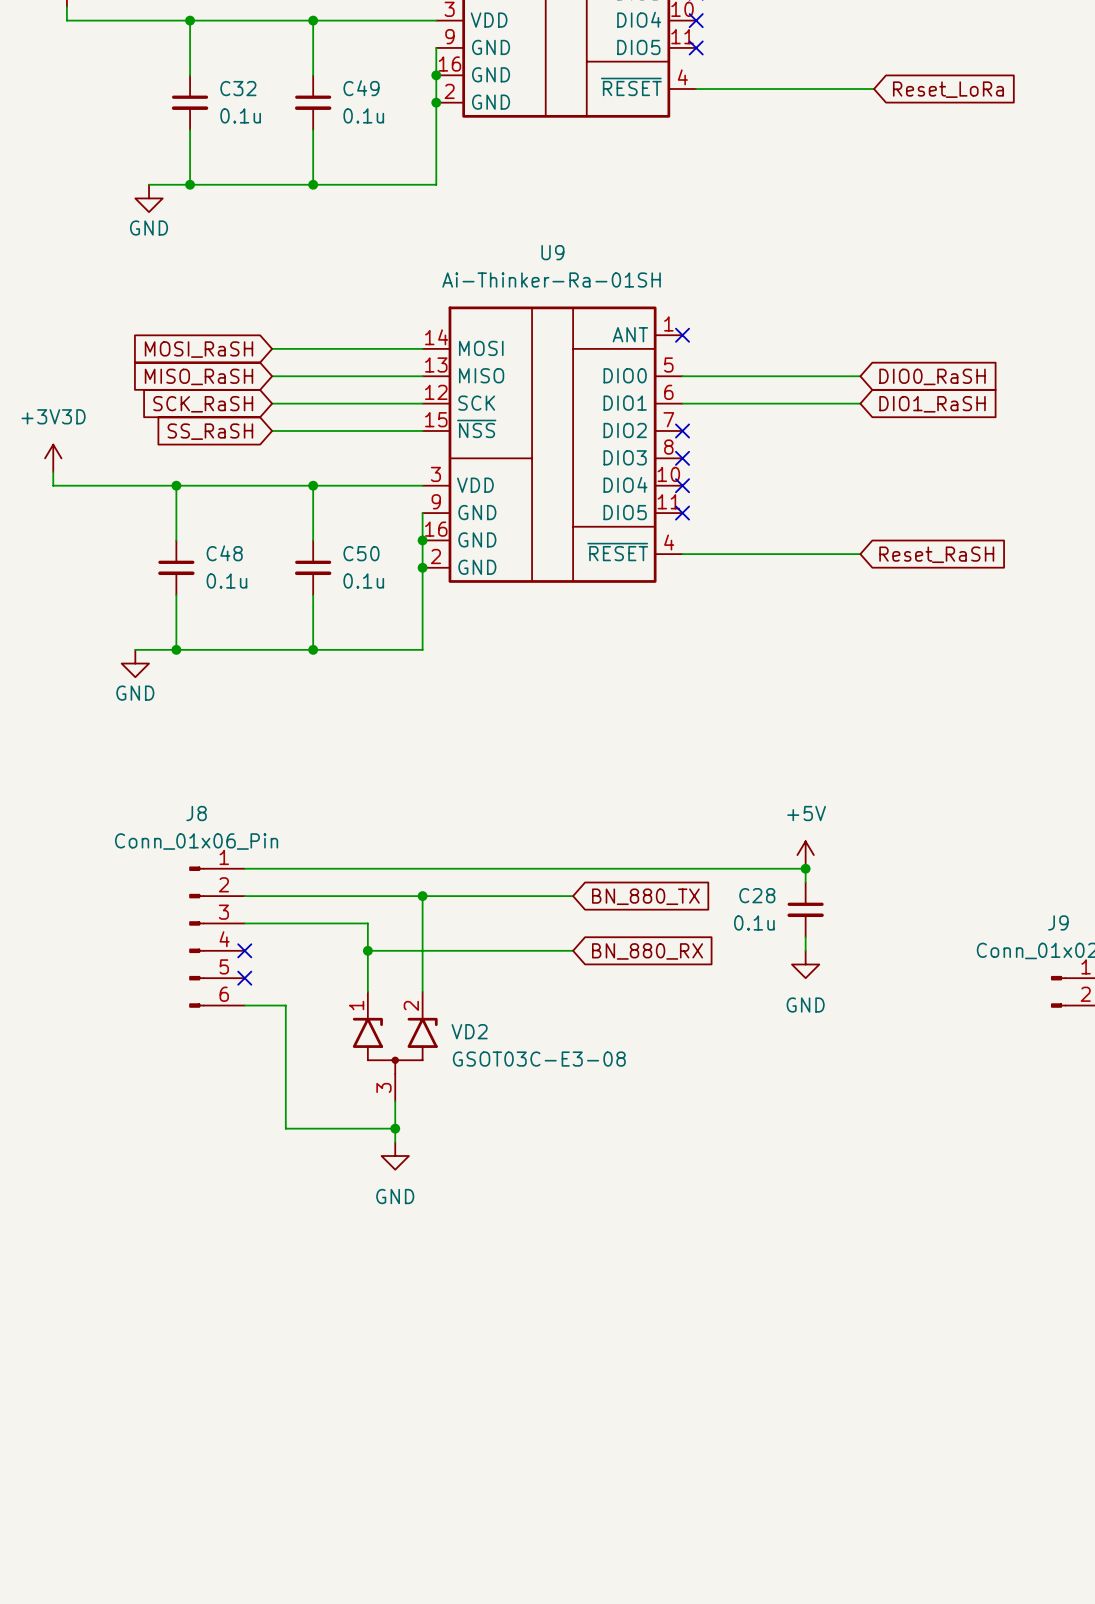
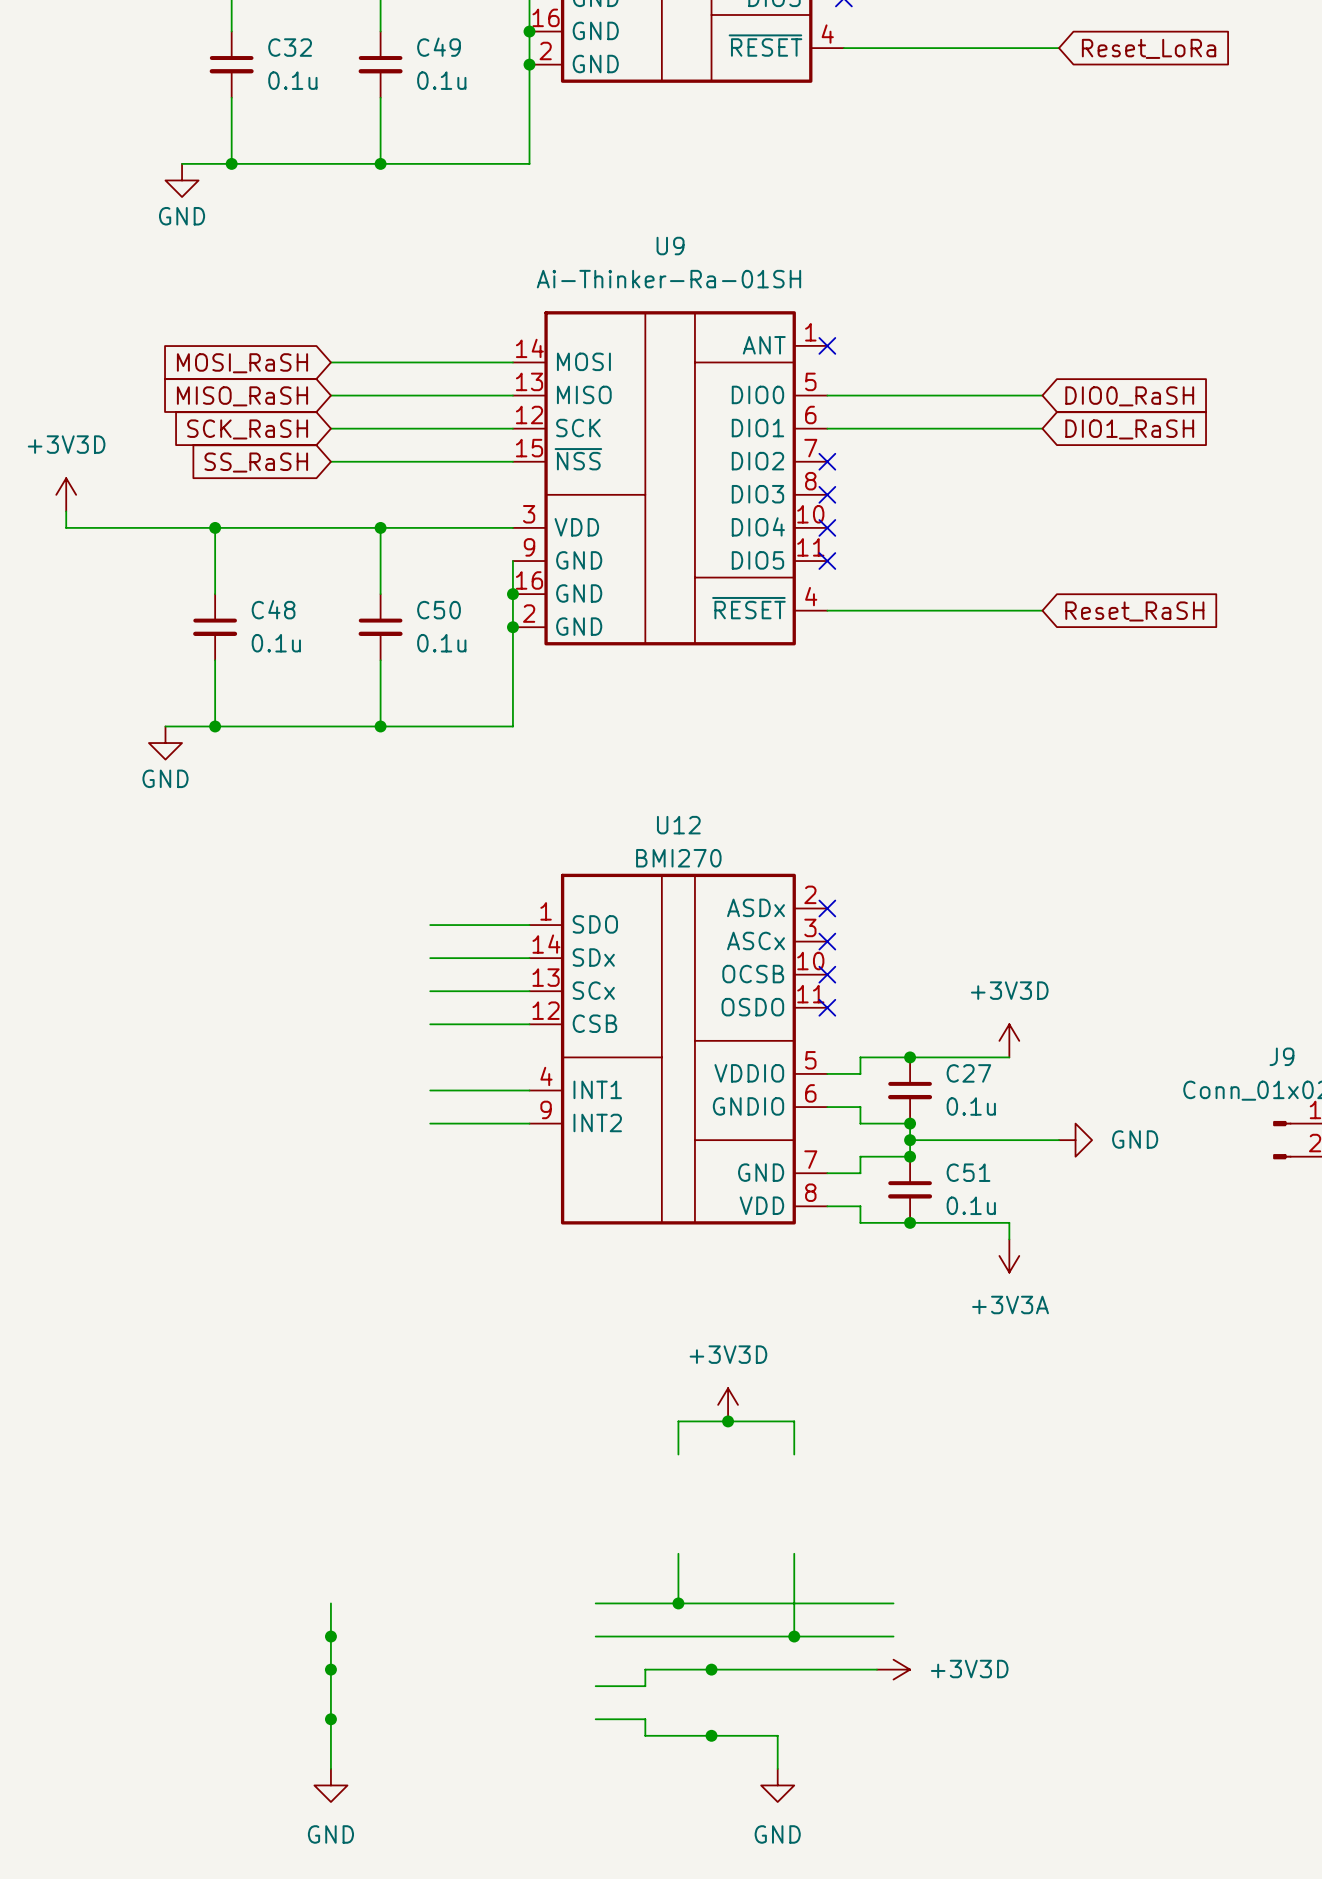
no-connect mark: none -> (827, 908)
wire: none -> (430, 925) (529, 925)
no-connect mark: none -> (827, 941)
wire: none -> (430, 958) (529, 958)
no-connect mark: none -> (827, 974)
power symbol: +5V (805, 855) -> none
wire: (244, 868) (354, 868) -> none
wire: (436, 868) (805, 868) (805, 882) -> none
junction: (805, 868) -> none
no-connect mark: none -> (827, 1007)
wire: (244, 896) (354, 896) -> none
wire: (422, 896) (422, 991) -> none
junction: (422, 896) -> none
wire: (436, 896) (573, 896) -> none
global label: BN_880_TX (645, 896) -> none
C28: 0.1u (805, 909) -> none
power symbol: none -> +3V3D (1009, 1040)
U12: none -> BMI270 (678, 1049)
wire: (244, 923) (367, 923) (367, 991) -> none
junction: none -> (910, 1057)
wire: none -> (1009, 1057) (860, 1057) (860, 1073) (827, 1073)
J8: Conn_01x06_Pin (217, 937) -> none
wire: (805, 937) (805, 950) -> none
no-connect mark: (244, 950) -> none
wire: none -> (430, 1090) (446, 1090)
junction: (367, 950) -> none
wire: (436, 950) (573, 950) -> none
C27: none -> 0.1u (910, 1090)
global label: BN_880_RX (647, 951) -> none
wire: none -> (827, 1107) (860, 1107) (860, 1123) (910, 1123) (910, 1156) (860, 1156) (860, 1173) (827, 1173)
power symbol rotation: 0° (805, 964) -> 90° counterclockwise (1075, 1140)
power symbol position: GND (805, 964) -> GND (1075, 1140)
no-connect mark: (244, 978) -> none
wire: none -> (430, 1123) (529, 1123)
junction: none -> (910, 1123)
wire: none -> (910, 1140) (1058, 1140)
junction: none -> (910, 1140)
wire: (244, 1005) (285, 1005) (285, 1128) (395, 1128) -> none
junction: none -> (910, 1156)
C51: none -> 0.1u (910, 1189)
VD2: GSOT03C-E3-08 (395, 1046) -> none
wire: none -> (827, 1206) (860, 1206) (860, 1222) (1009, 1222) (1009, 1239)
junction: none -> (910, 1222)
power symbol: none -> +3V3A (1009, 1255)
wire: (395, 1101) (395, 1142) -> none
junction: (395, 1128) -> none
power symbol: GND (395, 1156) -> none
power symbol: none -> +3V3D (728, 1404)
junction: none -> (728, 1421)
wire: none -> (678, 1454) (678, 1421) (794, 1421) (794, 1454)
wire: none -> (678, 1553) (678, 1603)
wire: none -> (794, 1553) (794, 1636)
wire: none -> (330, 1603) (330, 1768)
wire: none -> (595, 1603) (893, 1603)
junction: none -> (678, 1603)
junction: none -> (330, 1636)
wire: none -> (595, 1636) (893, 1636)
junction: none -> (794, 1636)
junction: none -> (330, 1669)
junction: none -> (711, 1669)
wire: none -> (876, 1669) (645, 1669) (645, 1686) (595, 1686)
power symbol: none -> +3V3D (893, 1669)
junction: none -> (330, 1719)
wire: none -> (595, 1719) (645, 1719) (645, 1735) (777, 1735) (777, 1768)
junction: none -> (711, 1735)
power symbol: none -> GND (330, 1785)
power symbol: none -> GND (777, 1785)

